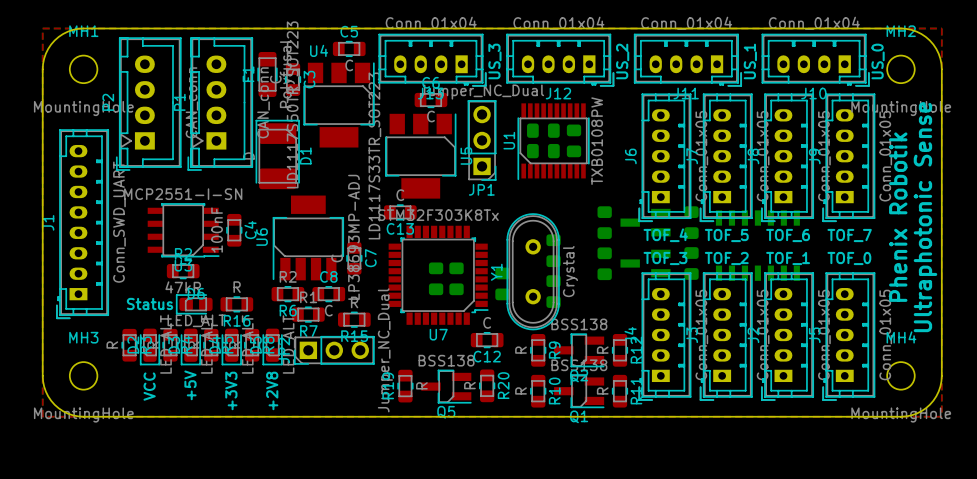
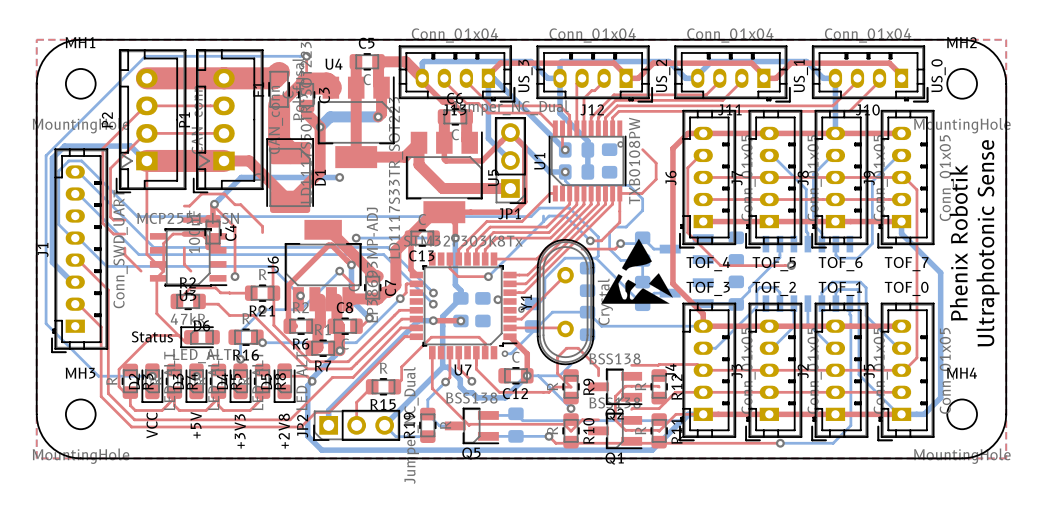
top track: none -> (306, 56) (306, 74) (319, 87) (330, 87) (326, 83) (306, 83) (301, 83) (279, 105) (279, 142) (290, 153)
bottom track: none -> (306, 56) (145, 56) (46, 155) (46, 323) (98, 376) (152, 376)
via: none -> (306, 56)
top track: none -> (355, 61) (356, 157) (404, 157) (419, 142) (419, 164) (442, 188) (510, 188)
top track: none -> (279, 72) (273, 78) (146, 78)
bottom track: none -> (422, 78) (423, 61) (531, 61) (547, 78) (560, 78)
top track: none -> (444, 78) (444, 81) (466, 103) (478, 103) (487, 113) (539, 113) (554, 127)
top track: none -> (466, 78) (466, 81) (490, 105) (560, 105) (569, 115) (569, 128)
top track: none -> (488, 78) (488, 75) (500, 63) (614, 63) (626, 75) (626, 78) (638, 78) (653, 63) (751, 63) (763, 75) (763, 78) (775, 78) (791, 63) (889, 63) (901, 75) (901, 78)
top track: none -> (582, 78) (576, 83) (576, 128)
top track: none -> (604, 78) (604, 81) (594, 90) (591, 90) (583, 98) (583, 128)
top track: none -> (719, 78) (719, 81) (706, 94) (614, 94) (591, 117) (591, 128)
top track: none -> (741, 78) (741, 81) (722, 100) (615, 100) (598, 117) (598, 128)
top track: none -> (857, 78) (857, 81) (832, 105) (617, 105) (605, 117) (605, 128)
top track: none -> (879, 78) (879, 81) (849, 111) (618, 111) (612, 117) (612, 128)
top track: none -> (224, 105) (145, 105) (102, 148) (102, 223) (113, 234) (124, 234)
top track: none -> (306, 106) (306, 113) (320, 127) (320, 171) (290, 201) (249, 160) (146, 160) (146, 254) (163, 271)
top track: none -> (378, 116) (381, 113) (381, 87) (378, 84) (378, 61) (405, 61) (442, 102) (451, 102) (466, 116) (466, 139) (469, 142)
bottom track: none -> (378, 116) (330, 116) (320, 127)
via: none -> (378, 116)
top track: none -> (444, 116) (444, 159) (446, 160) (482, 160) (510, 132) (524, 146) (524, 201) (514, 212) (436, 212) (411, 238) (411, 269) (416, 275)
via: none -> (320, 127)
top track: none -> (562, 128) (562, 147) (565, 149)
bottom track: none -> (510, 132) (549, 171) (565, 171) (565, 180) (569, 185) (629, 185) (642, 198) (642, 210) (626, 227) (615, 227) (609, 232) (609, 249) (620, 260) (642, 260) (642, 282)
top track: none -> (224, 133) (145, 133) (110, 168) (110, 217) (113, 220) (124, 220)
bottom track: none -> (835, 133) (835, 78) (823, 78) (806, 61) (711, 61) (697, 75) (697, 78) (685, 78) (668, 61) (561, 61) (560, 63) (560, 113) (587, 141) (587, 171)
top track: none -> (901, 133) (688, 133) (672, 148) (672, 283) (703, 314) (703, 326) (901, 326)
via: none -> (620, 144)
bottom track: none -> (565, 149) (493, 78) (488, 78) (488, 138) (510, 160)
via: none -> (565, 149)
top track: none -> (642, 149) (656, 163) (656, 179) (642, 193) (620, 193)
top track: none -> (703, 155) (700, 155) (687, 167) (687, 232) (720, 265) (791, 265)
bottom track: none -> (769, 155) (772, 155) (806, 189) (807, 244)
bottom track: none -> (835, 155) (832, 155) (813, 174) (813, 224) (821, 233) (821, 244)
bottom track: none -> (901, 155) (898, 155) (872, 181) (872, 243) (857, 258) (838, 258) (835, 255) (835, 244)
bottom track: none -> (146, 160) (130, 146) (64, 146) (52, 158) (52, 262) (72, 282) (75, 282)
bottom track: none -> (75, 171) (78, 171) (153, 247) (387, 247) (433, 293)
via: none -> (565, 171)
bottom track: none -> (339, 177) (241, 177) (214, 204)
via: none -> (339, 177)
top track: none -> (703, 177) (904, 177) (916, 189) (916, 357) (904, 370) (703, 370) (697, 364) (631, 365)
bottom track: none -> (75, 194) (78, 194) (138, 254) (383, 254) (433, 304)
top track: none -> (555, 193) (550, 193) (522, 221) (486, 221) (458, 249) (458, 259)
top track: none -> (569, 193) (569, 204) (546, 227) (490, 227) (467, 249) (467, 259)
top track: none -> (576, 193) (576, 204) (549, 232) (493, 232) (476, 249) (476, 259)
top track: none -> (583, 193) (583, 204) (550, 238) (496, 238) (485, 249) (485, 259)
top track: none -> (591, 193) (591, 204) (536, 259) (494, 259)
top track: none -> (598, 193) (598, 204) (527, 275) (509, 275)
top track: none -> (605, 193) (605, 204) (525, 283) (509, 283)
top track: none -> (612, 193) (612, 204) (524, 292) (509, 292)
top track: none -> (619, 193) (619, 222) (601, 240) (590, 240)
top track: none -> (703, 199) (901, 199)
via: none -> (214, 204)
top track: none -> (184, 206) (189, 206) (201, 194) (224, 194) (235, 204) (240, 204) (262, 226) (262, 232)
bottom track: none -> (543, 216) (543, 221)
top track: none -> (184, 220) (212, 221) (214, 204) (214, 206) (235, 227) (235, 276)
top track: none -> (703, 221) (901, 221)
bottom track: none -> (901, 221) (901, 233) (940, 272) (940, 397) (924, 414) (898, 414) (858, 374) (858, 290) (838, 289) (835, 292) (835, 303)
top track: none -> (328, 229) (375, 276) (378, 276)
bottom track: none -> (356, 238) (433, 238)
via: none -> (356, 238)
top track: none -> (455, 238) (455, 223) (444, 212) (434, 212) (395, 250) (395, 285) (378, 298) (353, 299) (353, 284) (339, 271)
bottom track: none -> (455, 238) (455, 284) (460, 290) (460, 298) (442, 316) (442, 367)
via: none -> (455, 238)
drawing: none -> [601, 238, 673, 304]
bottom track: none -> (590, 240) (565, 216) (549, 216) (488, 276)
via: none -> (590, 240)
top track: none -> (212, 243) (203, 234) (173, 234) (163, 243) (163, 271)
top track: none -> (620, 243) (615, 249) (582, 249)
bottom track: none -> (620, 243) (636, 243) (642, 237) (653, 249) (670, 249)
via: none -> (620, 243)
bottom track: none -> (779, 244) (779, 257) (749, 287) (749, 291) (736, 304) (703, 303)
top track: none -> (124, 248) (124, 254) (141, 271)
top track: none -> (184, 248) (184, 264) (190, 271)
C4 position: (234, 230) -> (212, 232)
top track: none -> (449, 259) (449, 268) (458, 276) (488, 276)
bottom track: none -> (596, 258) (642, 304) (654, 293) (670, 293)
bottom track: none -> (596, 258) (598, 255) (598, 236) (569, 208) (539, 208) (531, 216) (137, 216) (81, 160) (68, 160) (58, 171) (58, 224) (72, 238) (78, 238) (106, 266) (271, 266) (300, 295)
bottom track: none -> (596, 258) (565, 258) (544, 278) (544, 297) (537, 304) (526, 304) (521, 309)
top track: none -> (75, 260) (78, 260) (108, 290) (108, 393) (134, 419) (290, 419) (332, 377) (353, 377) (400, 327) (416, 327)
top track: none -> (273, 265) (273, 325) (310, 361) (348, 361) (399, 310) (416, 310)
top track: none -> (351, 265) (331, 245) (328, 245) (288, 285) (288, 319) (295, 326)
bottom track: none -> (351, 265) (351, 300) (369, 318)
via: none -> (351, 265)
via: none -> (791, 265)
top track: none -> (163, 271) (156, 277) (156, 313) (185, 342)
bottom track: none -> (339, 271) (301, 309) (262, 309) (240, 331) (240, 359)
via: none -> (339, 271)
top track: none -> (565, 275) (521, 319) (509, 319)
via: none -> (235, 276)
via: none -> (488, 276)
top track: none -> (416, 283) (406, 283) (406, 292) (400, 298)
top track: none -> (251, 293) (220, 292) (215, 287) (190, 287) (180, 298) (180, 304)
R21: none -> R (262, 293)
via: none -> (433, 293)
via: none -> (300, 295)
bottom track: none -> (400, 298) (356, 342) (262, 342)
via: none -> (400, 298)
top track: none -> (320, 299) (320, 323) (317, 326) (317, 348)
top track: none -> (336, 299) (339, 350)
via: none -> (497, 299)
top track: none -> (75, 304) (78, 304) (101, 327) (101, 396) (131, 427) (301, 427) (315, 412) (329, 412) (404, 336) (416, 336)
top track: none -> (201, 304) (218, 304) (229, 315) (253, 315) (307, 368) (351, 368) (401, 319) (416, 319)
via: none -> (433, 304)
bottom track: none -> (779, 303) (779, 292) (774, 287) (759, 287) (756, 290) (756, 307) (715, 348) (703, 348)
bottom track: none -> (793, 303) (793, 326) (772, 348) (769, 348)
bottom track: none -> (807, 303) (807, 323) (832, 348) (835, 348)
bottom track: none -> (821, 303) (821, 292) (832, 282) (860, 282) (866, 287) (866, 315) (898, 348) (901, 348)
bottom track: none -> (849, 303) (850, 425) (833, 443) (780, 443)
via: none -> (262, 309)
via: none -> (521, 309)
top track: none -> (369, 318) (362, 326)
via: none -> (369, 318)
top track: none -> (433, 320) (460, 320)
bottom track: none -> (433, 320) (418, 320) (328, 410) (328, 425)
via: none -> (433, 320)
via: none -> (460, 320)
bottom track: none -> (703, 326) (601, 326) (587, 312) (552, 312) (511, 353) (504, 353)
top track: none -> (509, 327) (565, 328)
top track: none -> (178, 335) (152, 335) (119, 369) (119, 386) (130, 398) (130, 405) (135, 410) (162, 410) (174, 398) (174, 405) (179, 410) (206, 410) (218, 398) (218, 405) (223, 410) (250, 410) (262, 398)
top track: none -> (509, 336) (527, 354) (527, 375)
via: none -> (262, 342)
bottom track: none -> (339, 350) (312, 378) (307, 385) (307, 436) (321, 450) (652, 450) (688, 414) (703, 414) (690, 414) (684, 420) (522, 420) (515, 413) (514, 415) (488, 415)
via: none -> (339, 350)
top track: none -> (432, 352) (432, 388) (469, 425) (564, 424) (571, 431) (582, 419) (598, 419)
top track: none -> (449, 352) (449, 377) (445, 382)
top track: none -> (458, 352) (458, 368) (471, 381)
top track: none -> (476, 352) (476, 369) (499, 392) (549, 392) (554, 387) (571, 387) (557, 373) (557, 357) (566, 348) (578, 348) (598, 368) (598, 375)
top track: none -> (485, 352) (485, 343) (479, 337) (431, 337) (401, 367) (401, 379) (394, 386)
R15 position: (354, 319) -> (383, 386)
via: none -> (504, 353)
via: none -> (240, 359)
bottom track: none -> (571, 364) (559, 375) (527, 375) (505, 397) (477, 397) (472, 392) (466, 392) (460, 386) (460, 379) (448, 367) (442, 367)
bottom track: none -> (442, 367) (384, 425) (395, 436) (427, 436)
via: none -> (152, 376)
via: none -> (196, 376)
top track: none -> (284, 376) (307, 376) (312, 381)
via: none -> (527, 375)
bottom track: none -> (538, 375) (571, 408)
via: none -> (312, 381)
bottom track: none -> (445, 382) (427, 399) (427, 414) (439, 425) (455, 425)
via: none -> (445, 382)
via: none -> (471, 381)
JP2 position: (334, 350) -> (356, 425)
top track: none -> (372, 386) (356, 402) (356, 425)
top track: none -> (659, 387) (625, 386) (615, 396) (615, 420) (625, 430) (659, 431) (675, 414) (901, 414)
top track: none -> (901, 392) (675, 392) (659, 408) (631, 409)
via: none -> (571, 408)
R20 side: top (487, 385) -> bottom (515, 425)
bottom track: none -> (488, 436) (549, 436)
top track: none -> (549, 436) (555, 443) (780, 443)
via: none -> (549, 436)
via: none -> (780, 443)

